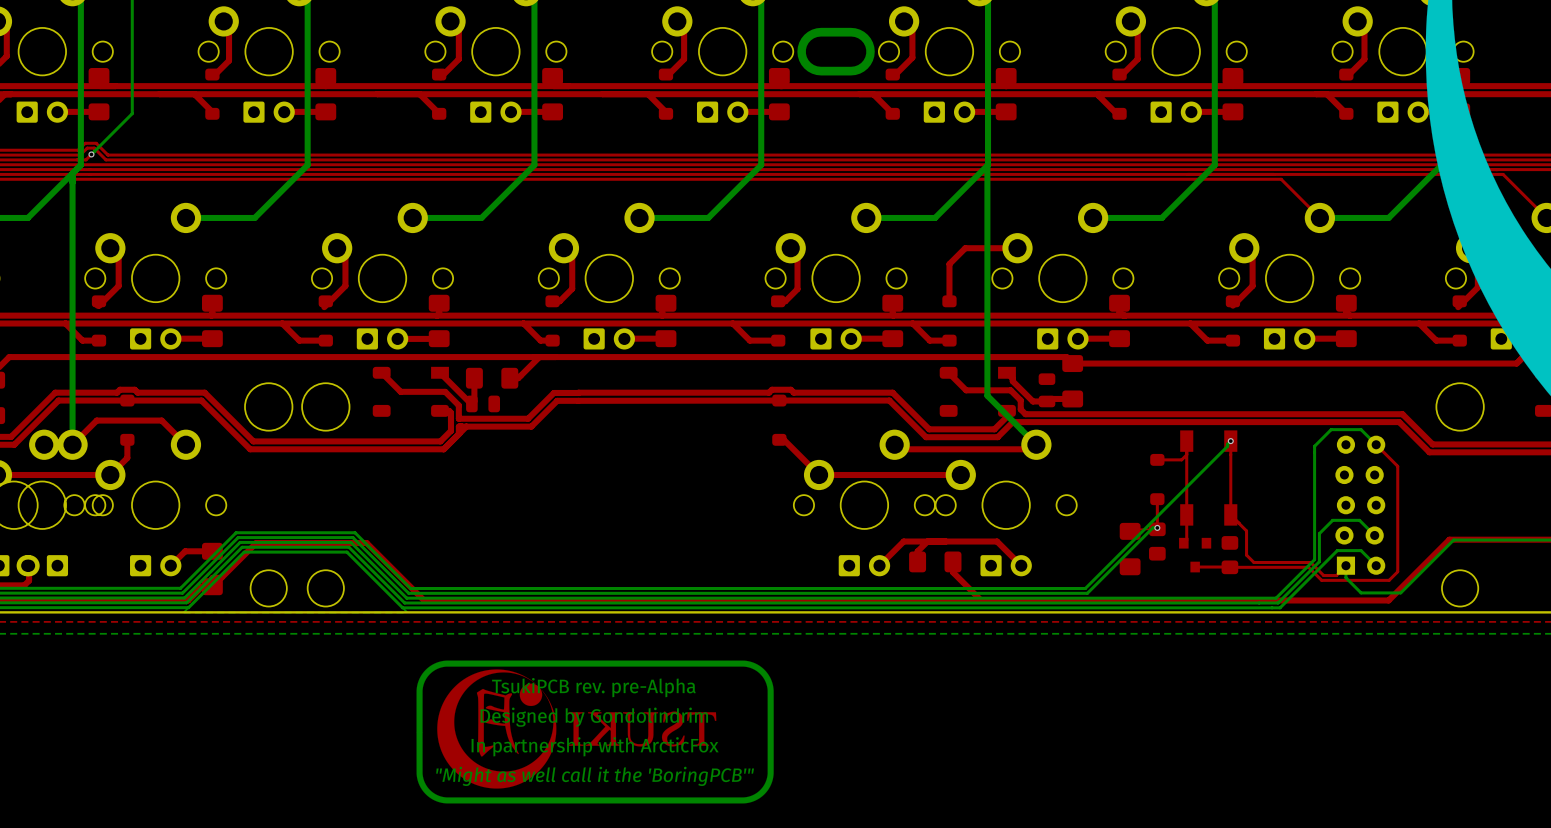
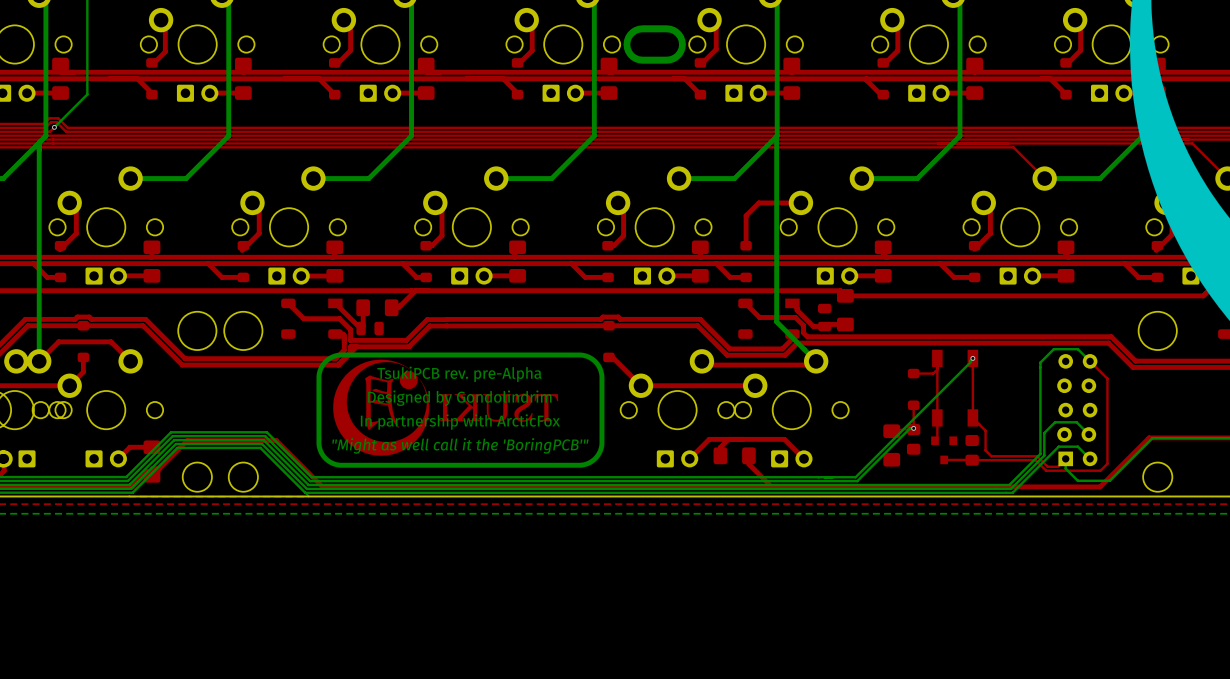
part position: (576, 729) -> (445, 407)
part position: (595, 732) -> (460, 410)

